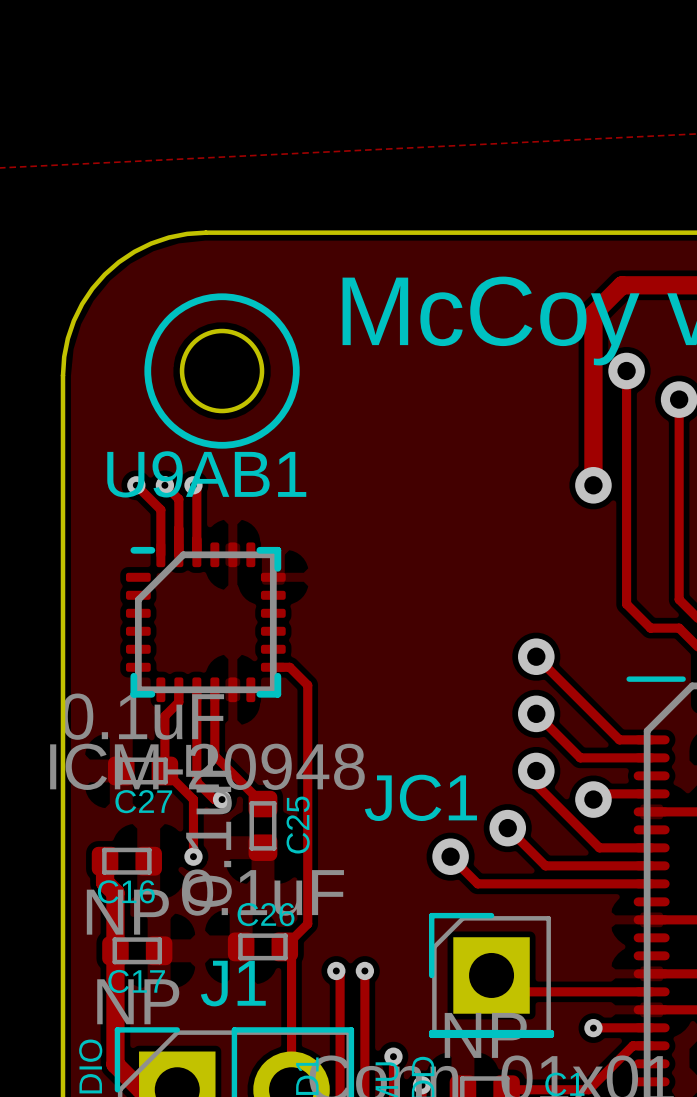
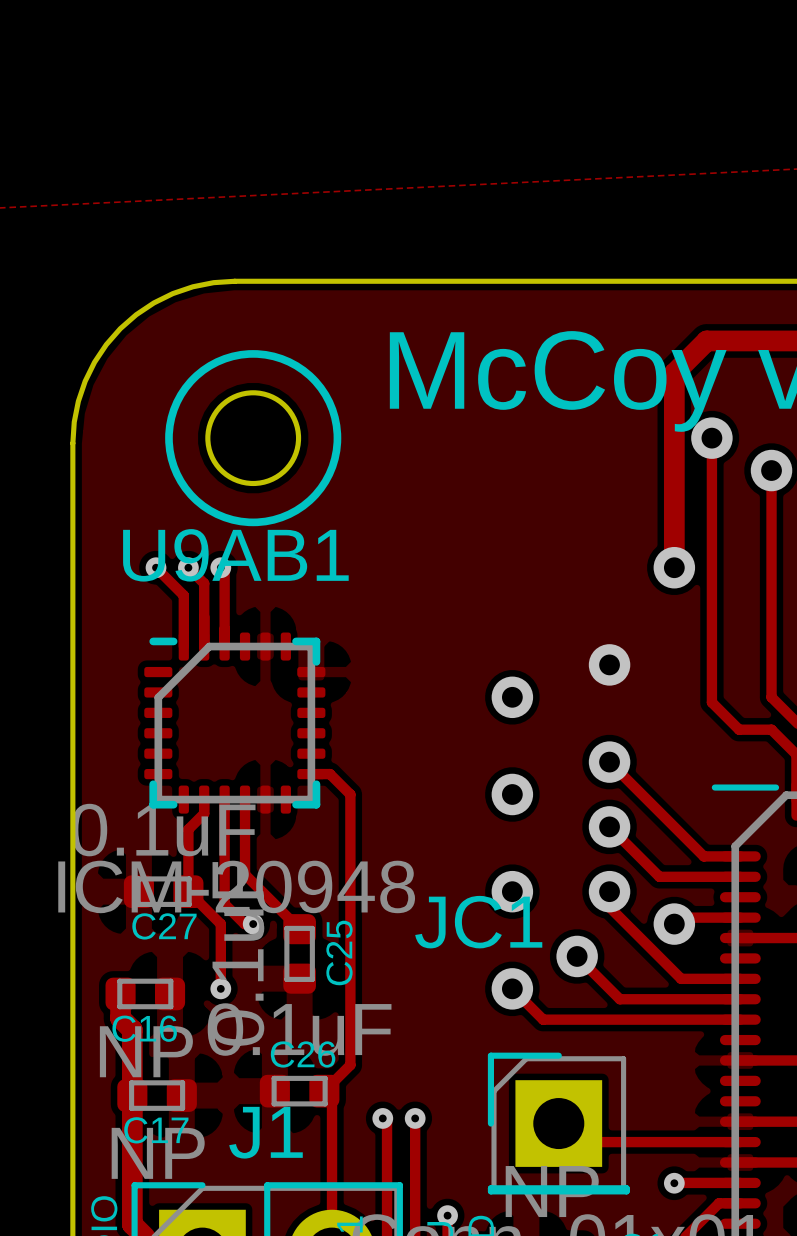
via: none -> (609, 664)
via: none -> (512, 697)
via: none -> (512, 794)
via: none -> (512, 891)

